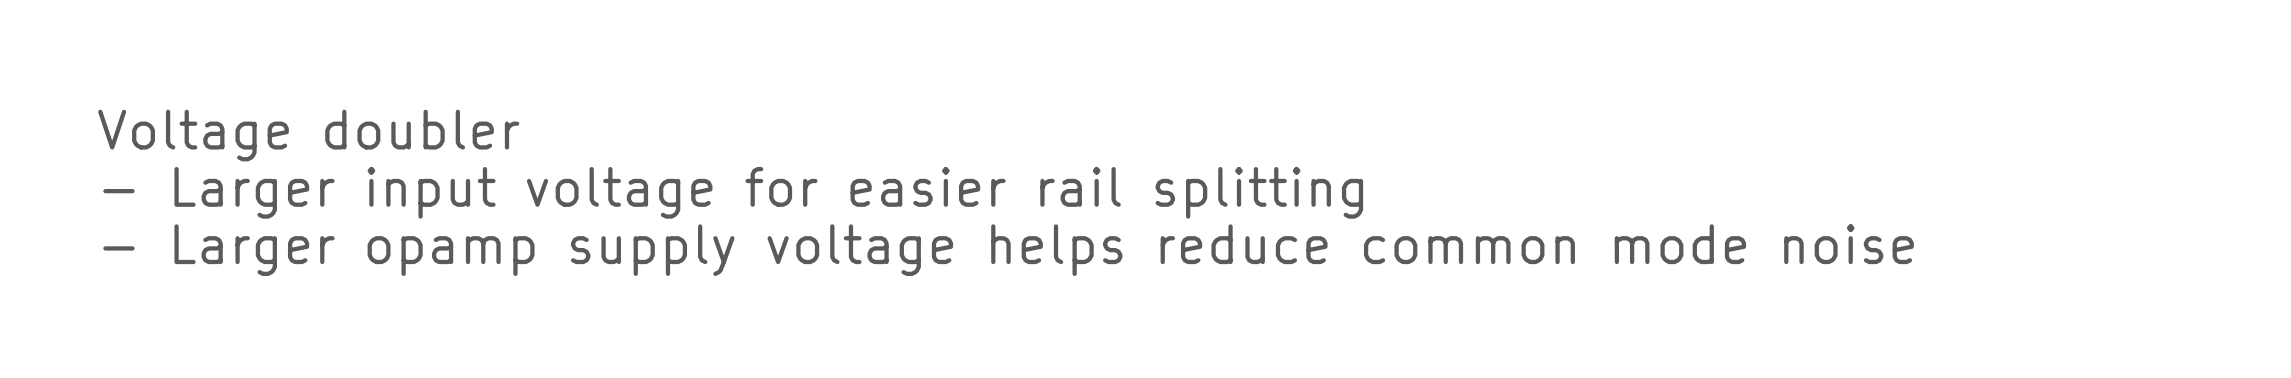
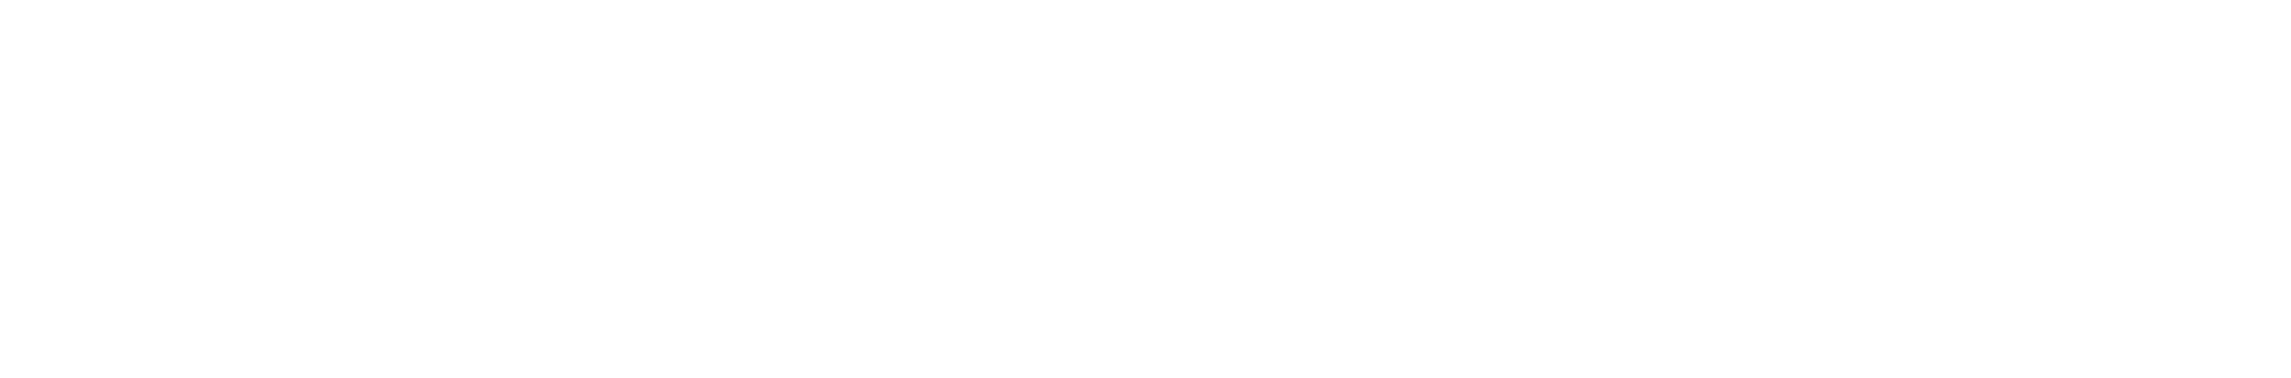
text: Voltage doubler (308, 135) -> none
text: - Larger input voltage for easier rail splitting (733, 192) -> none
text: - Larger opamp supply voltage helps reduce common mode noise (1008, 250) -> none

